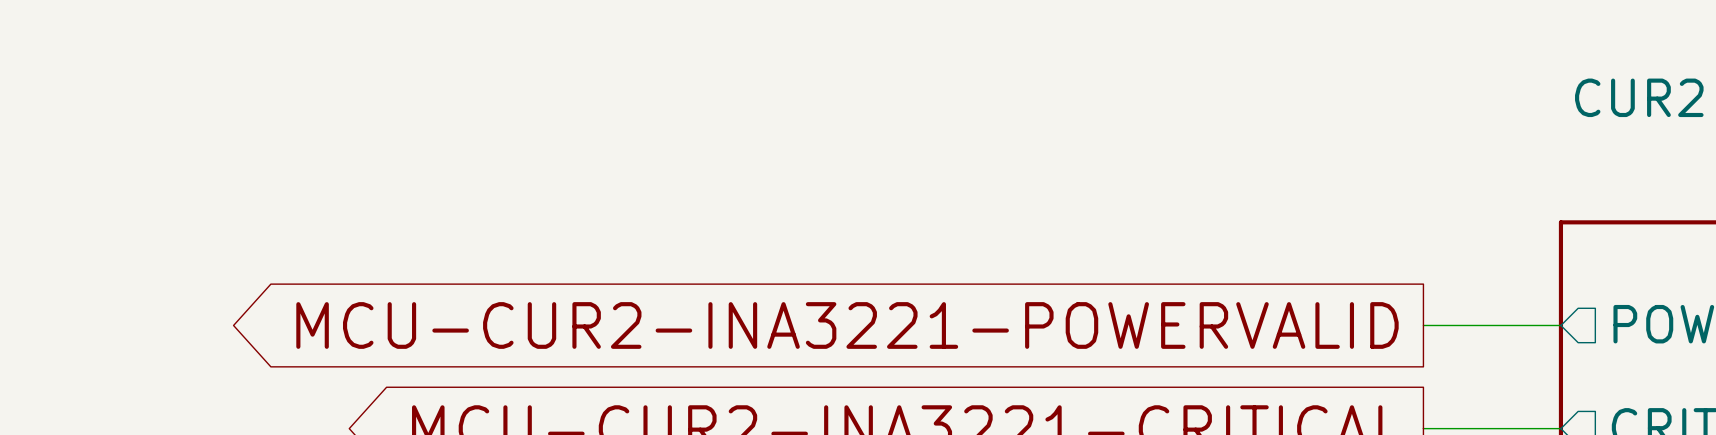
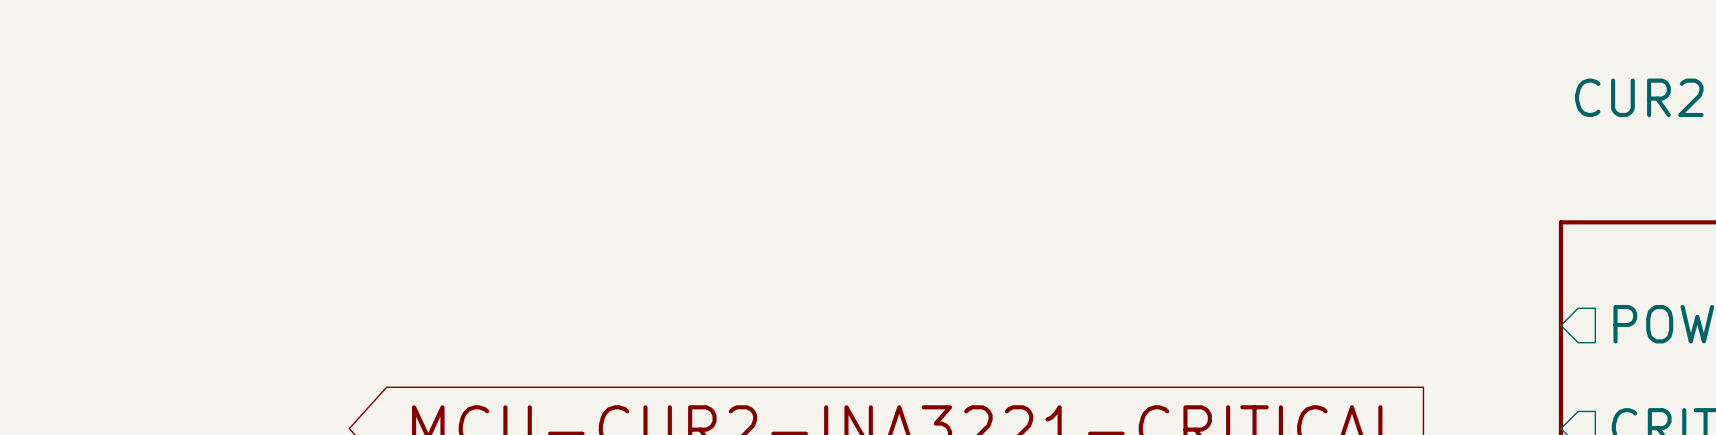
global label: MCU-CUR2-INA3221-POWERVALID (847, 325) -> none
wire: (1423, 325) (1560, 325) -> none
wire: (1423, 428) (1560, 428) -> none

